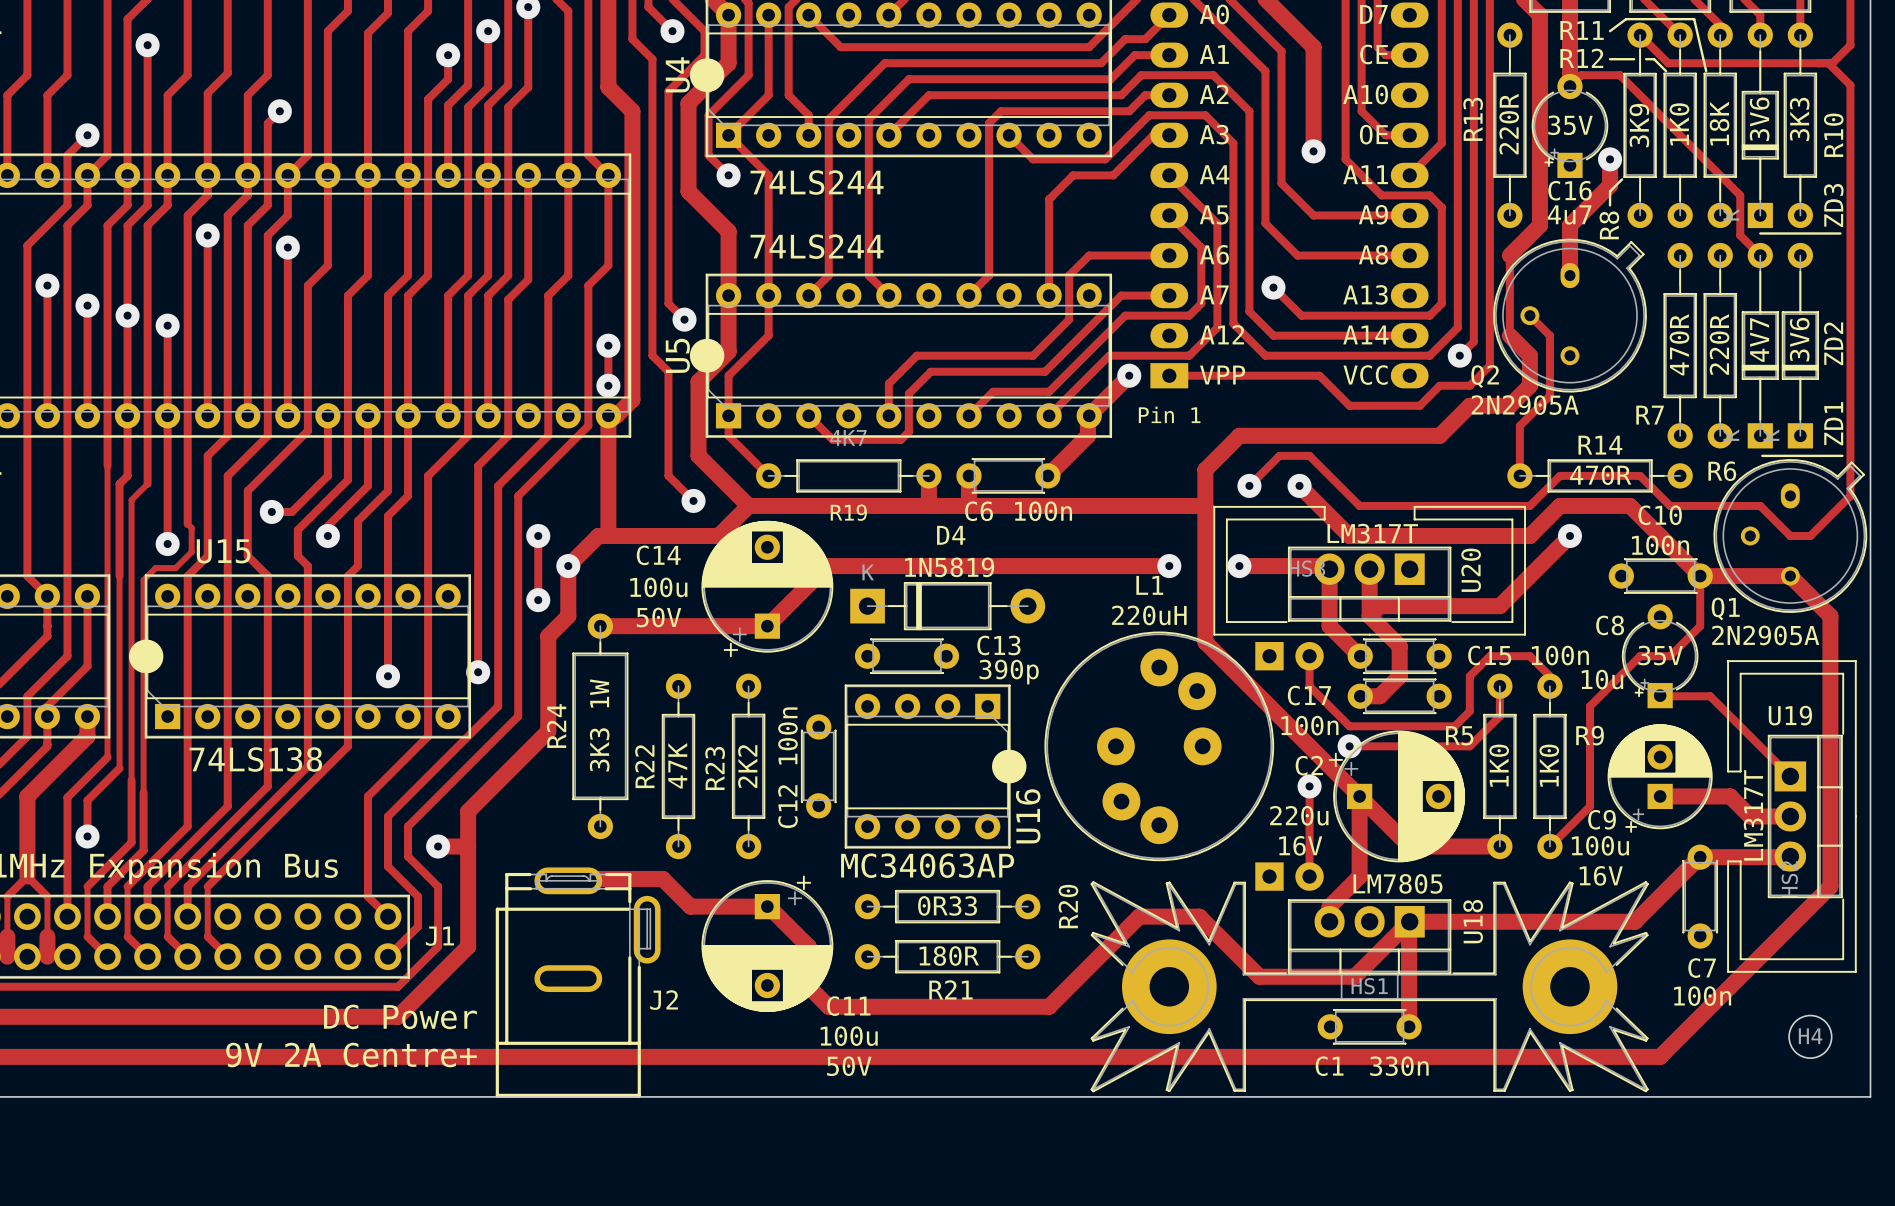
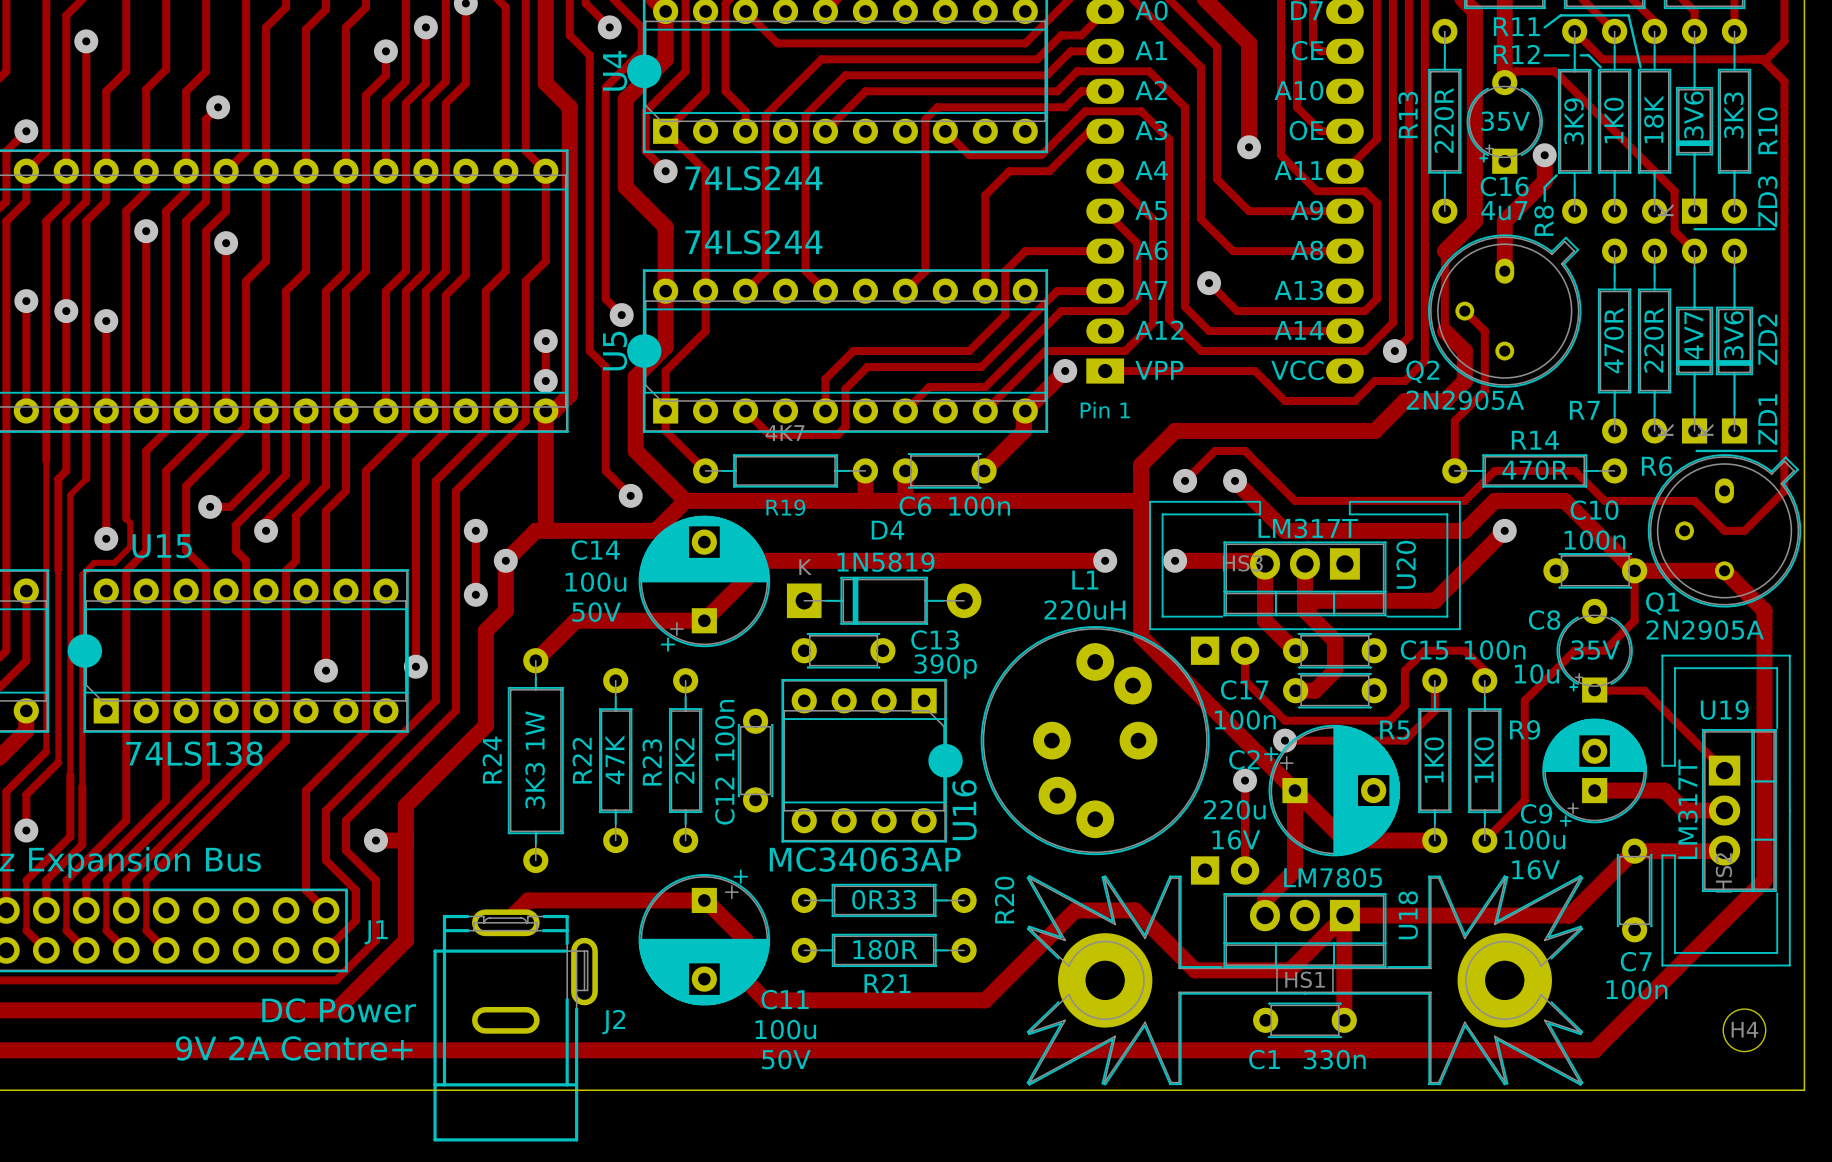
track: (600, 626) (638, 626) -> (535, 660) (575, 620)
R24 position: (600, 726) -> (535, 760)
J2 footprint: [495, 867, 661, 1098] -> [433, 909, 598, 1142]
track: (568, 878) (662, 878) (690, 906) -> (505, 922) (528, 900) (627, 900)

